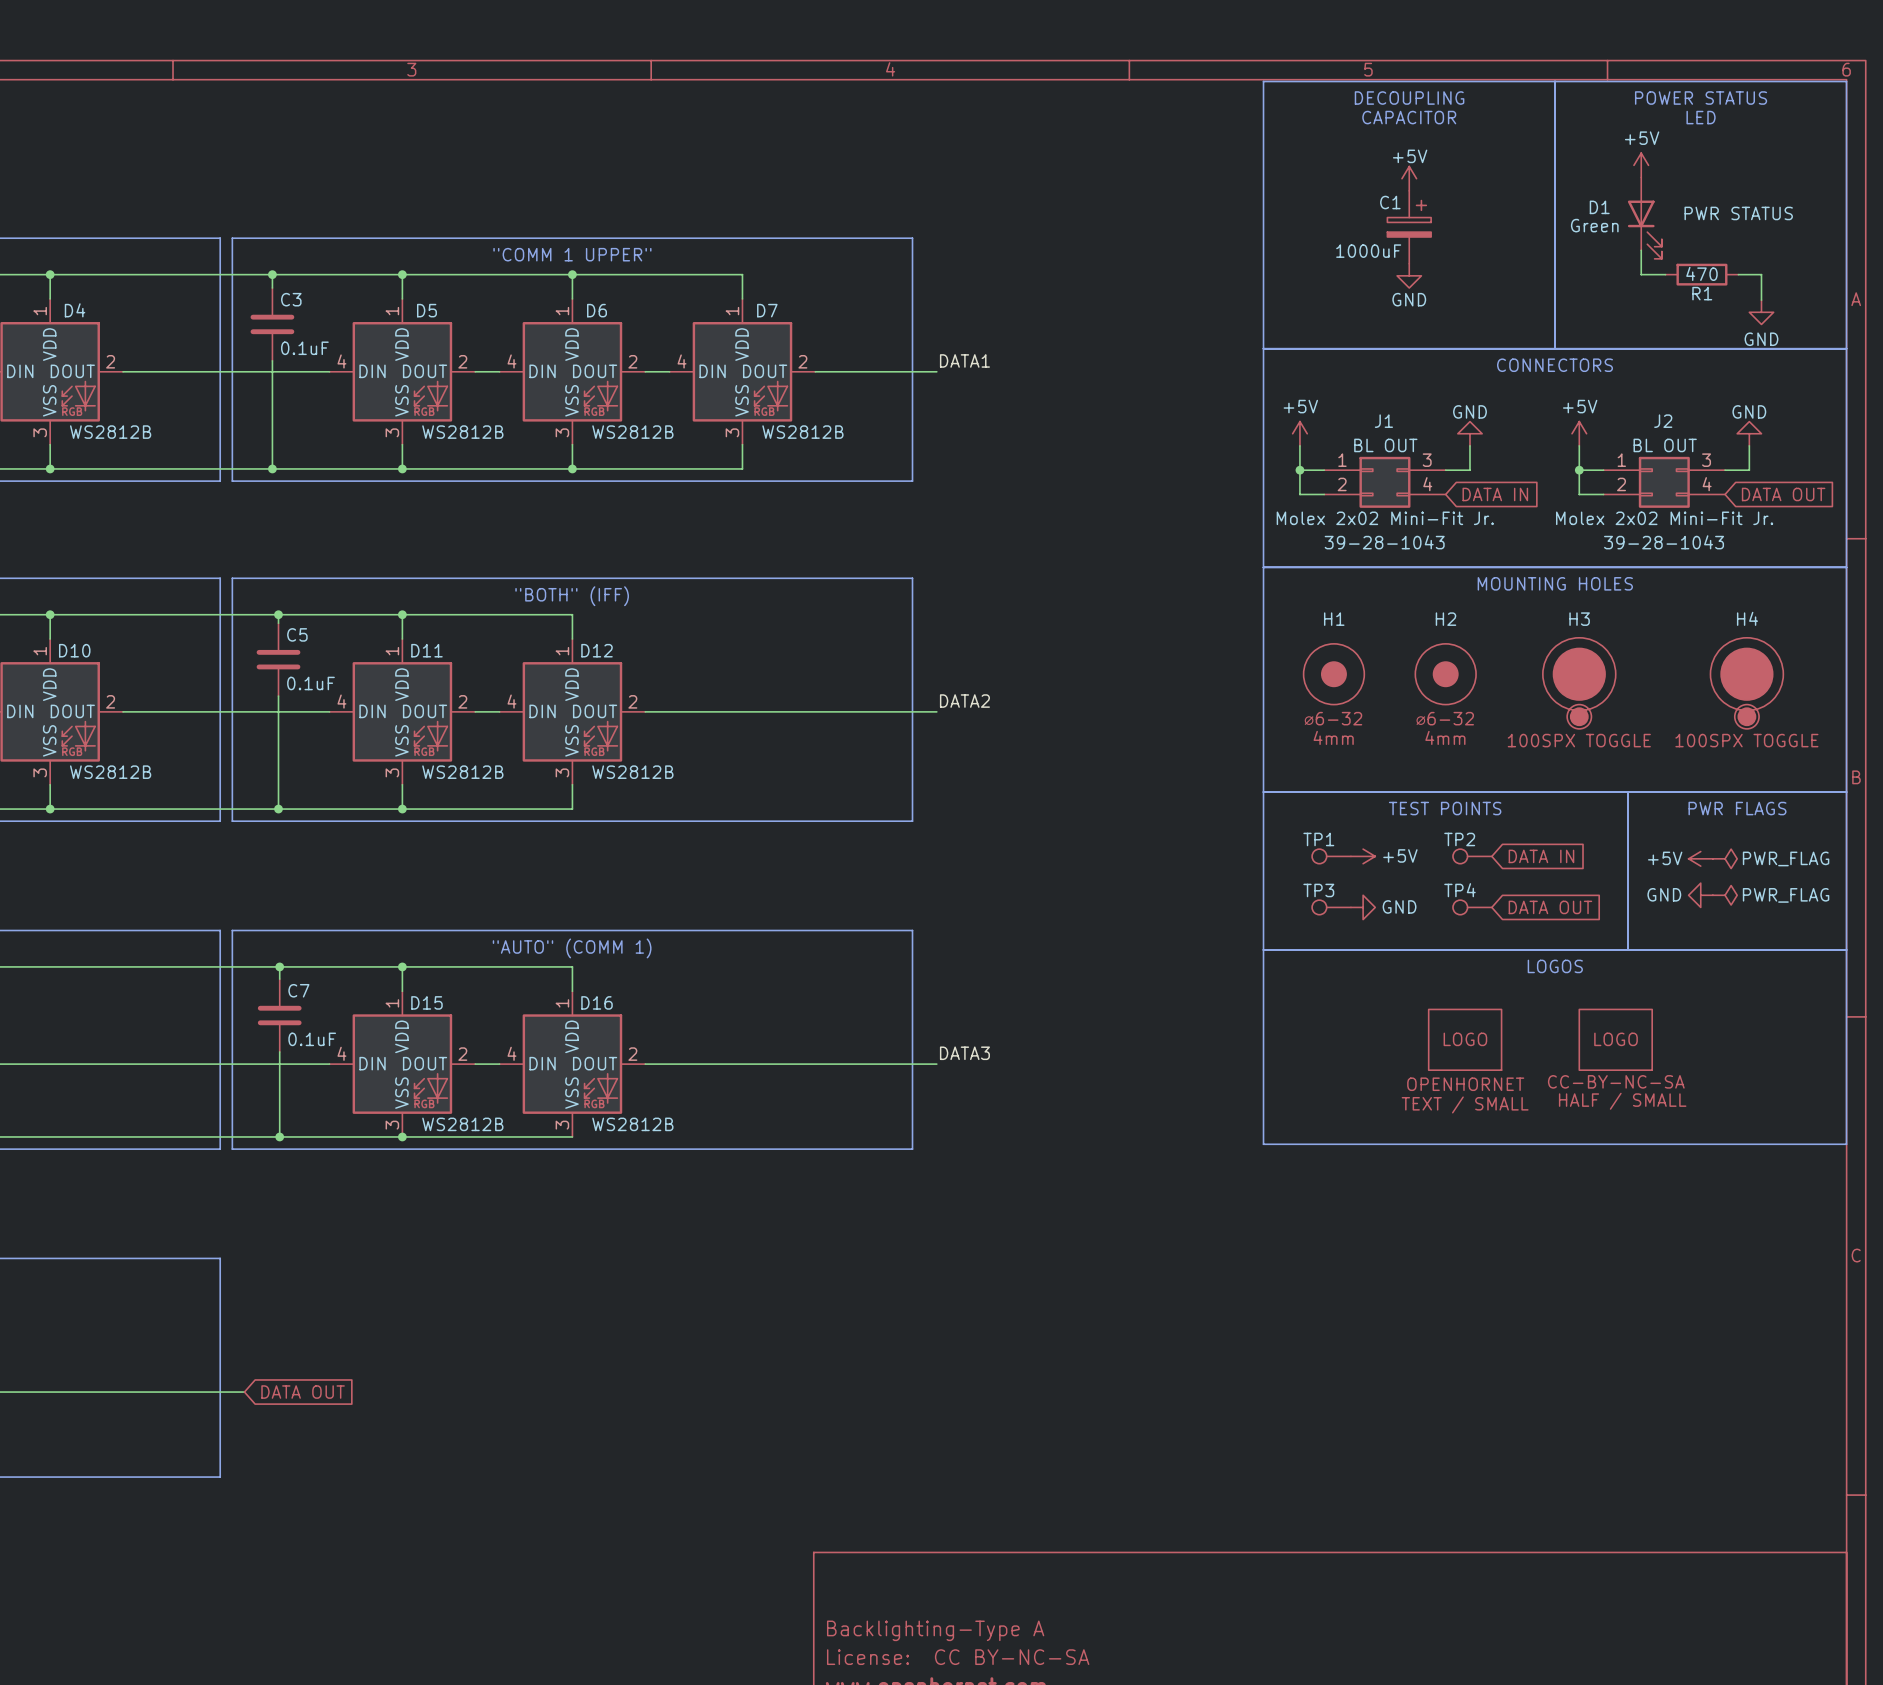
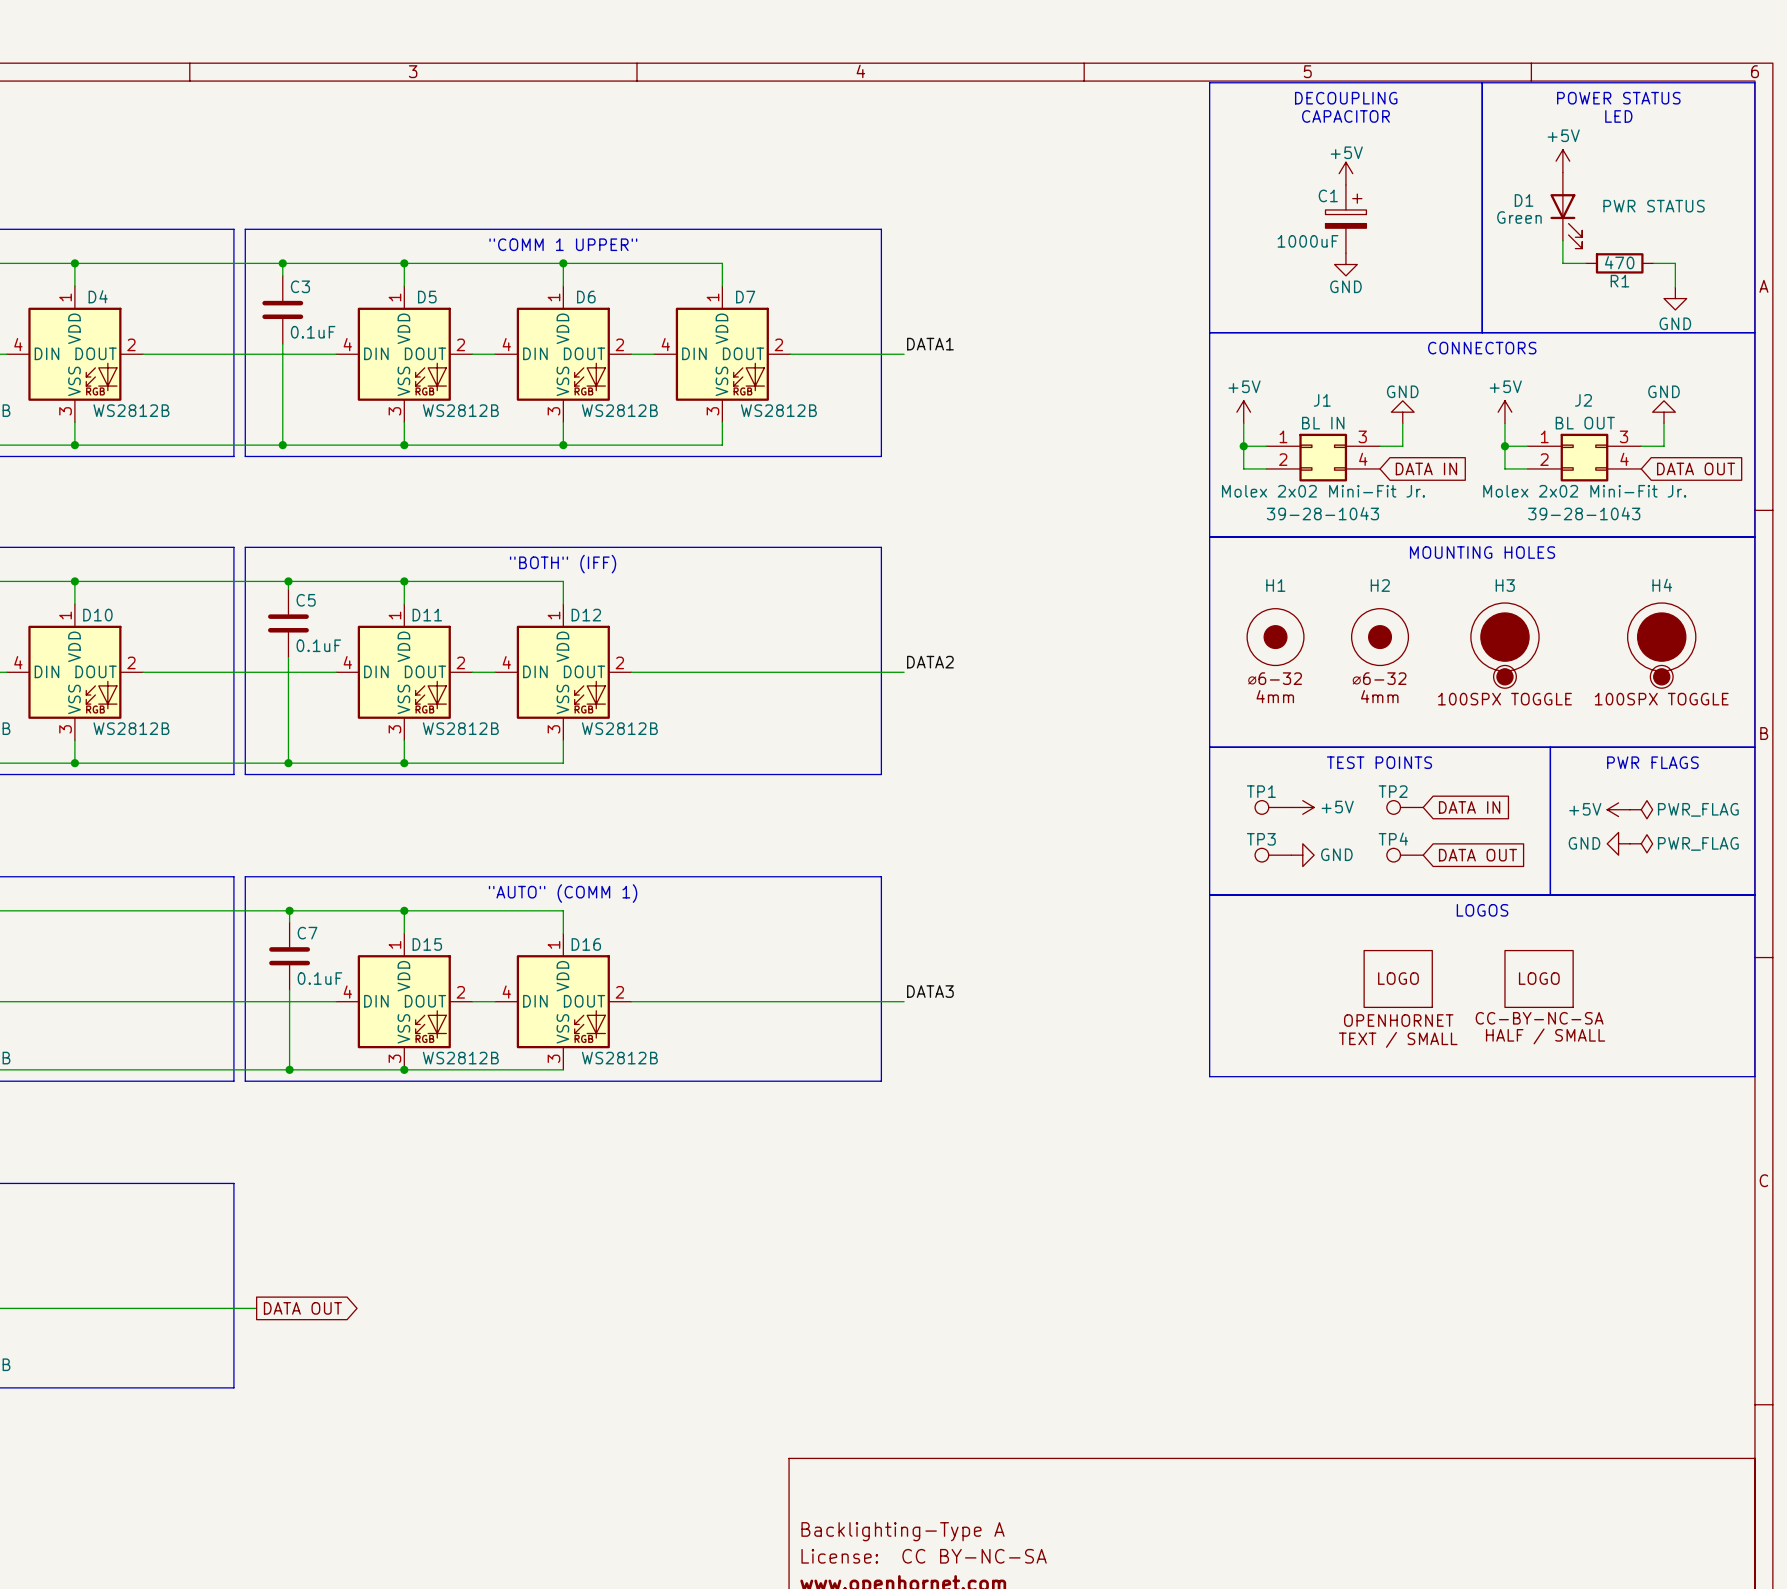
J1 text: BL OUT (1385, 445) -> BL IN (1323, 423)
global label shape: input (303, 1392) -> output (302, 1308)

